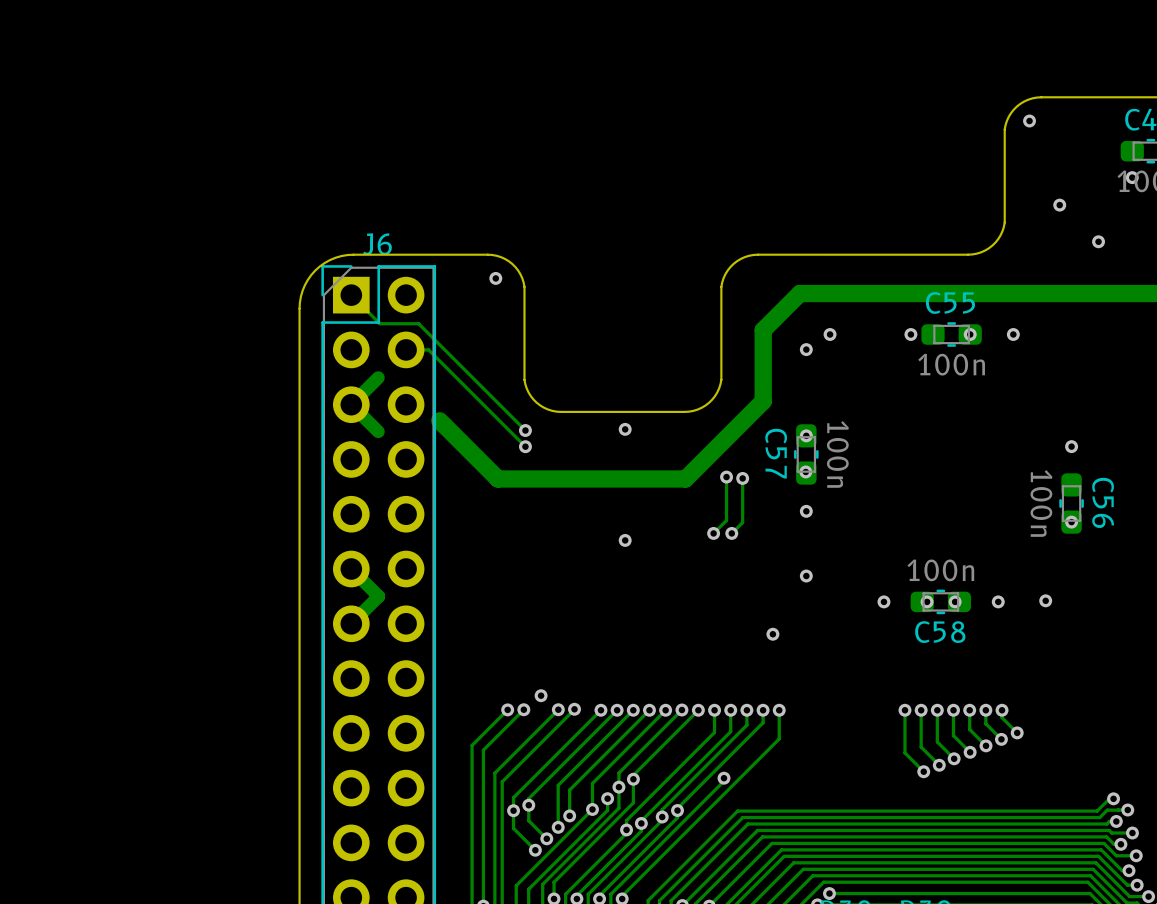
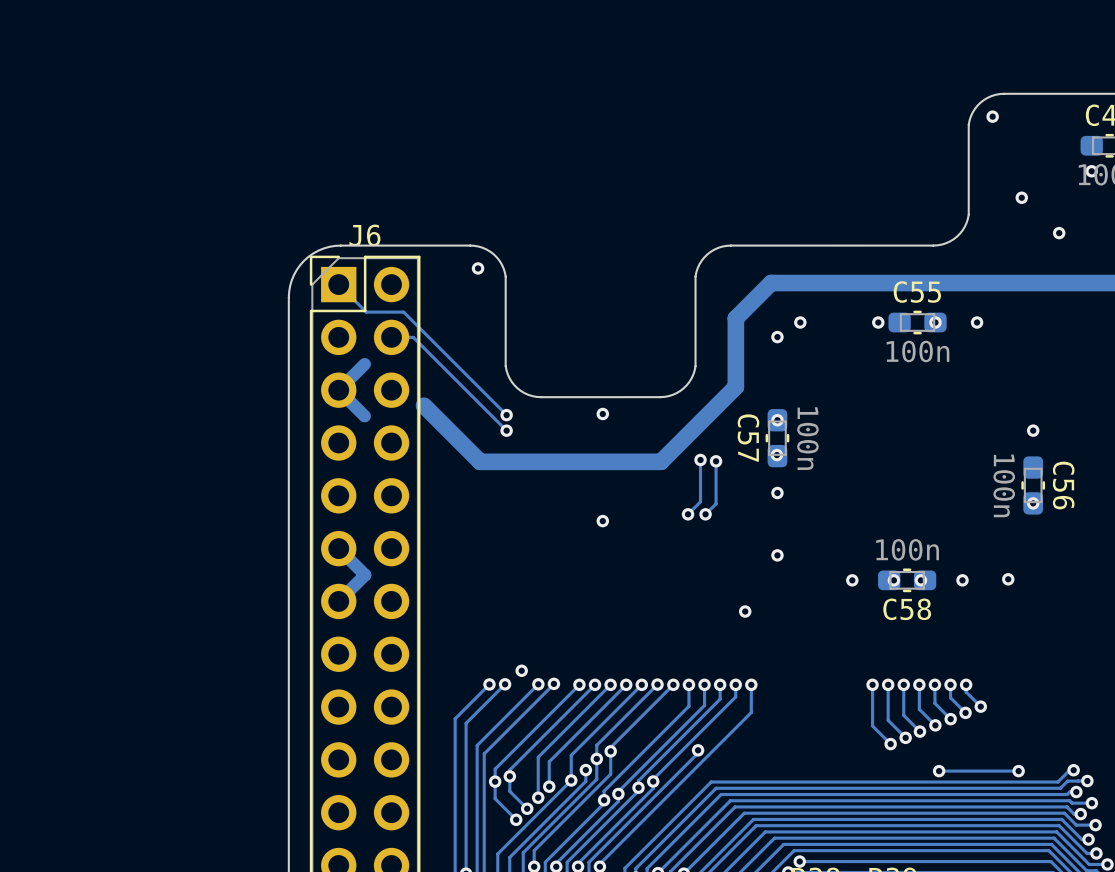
via: none -> (939, 771)
track: none -> (1018, 771) (939, 771)
via: none -> (1018, 771)

